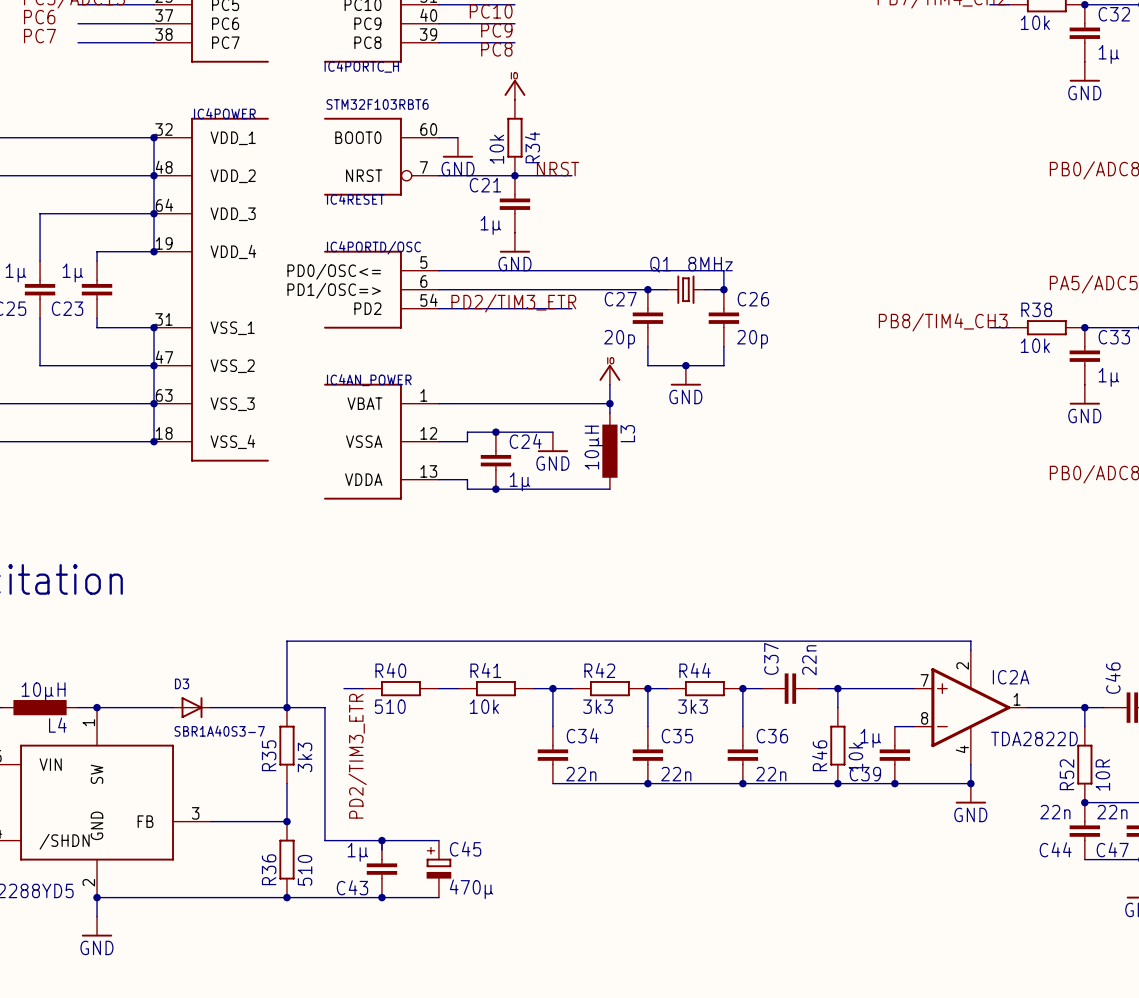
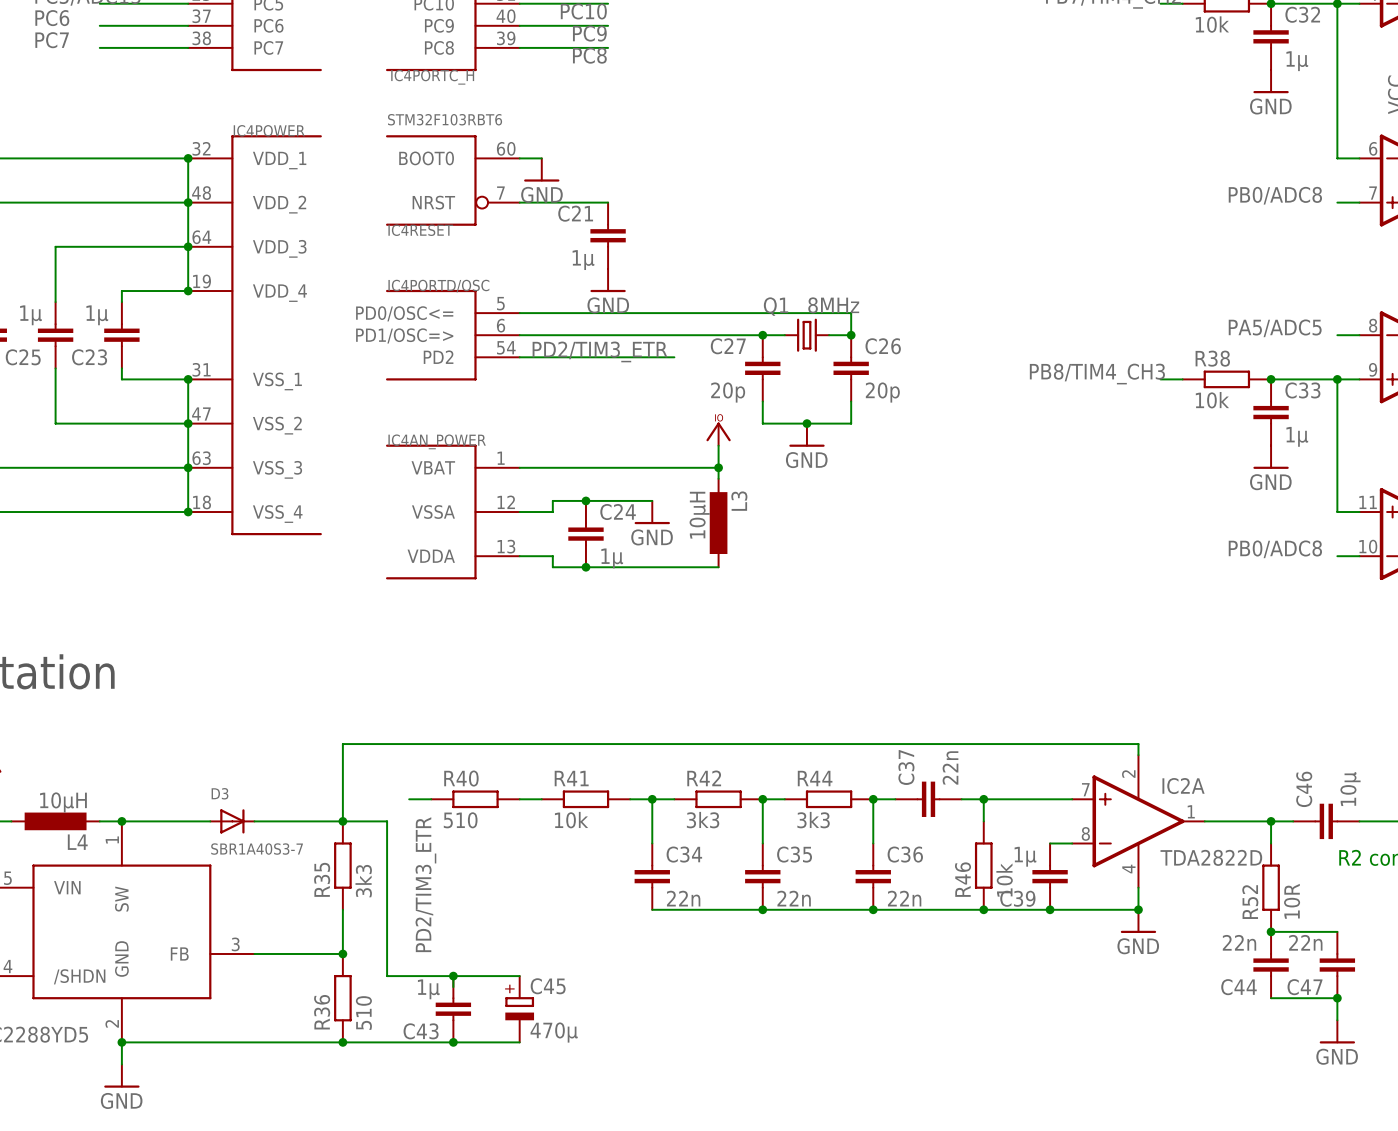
power symbol: (514, 89) -> none
R34: 10k (514, 137) -> none
label: NRST (558, 169) -> none
wire: (514, 175) (571, 175) -> none
junction: (514, 175) -> none

